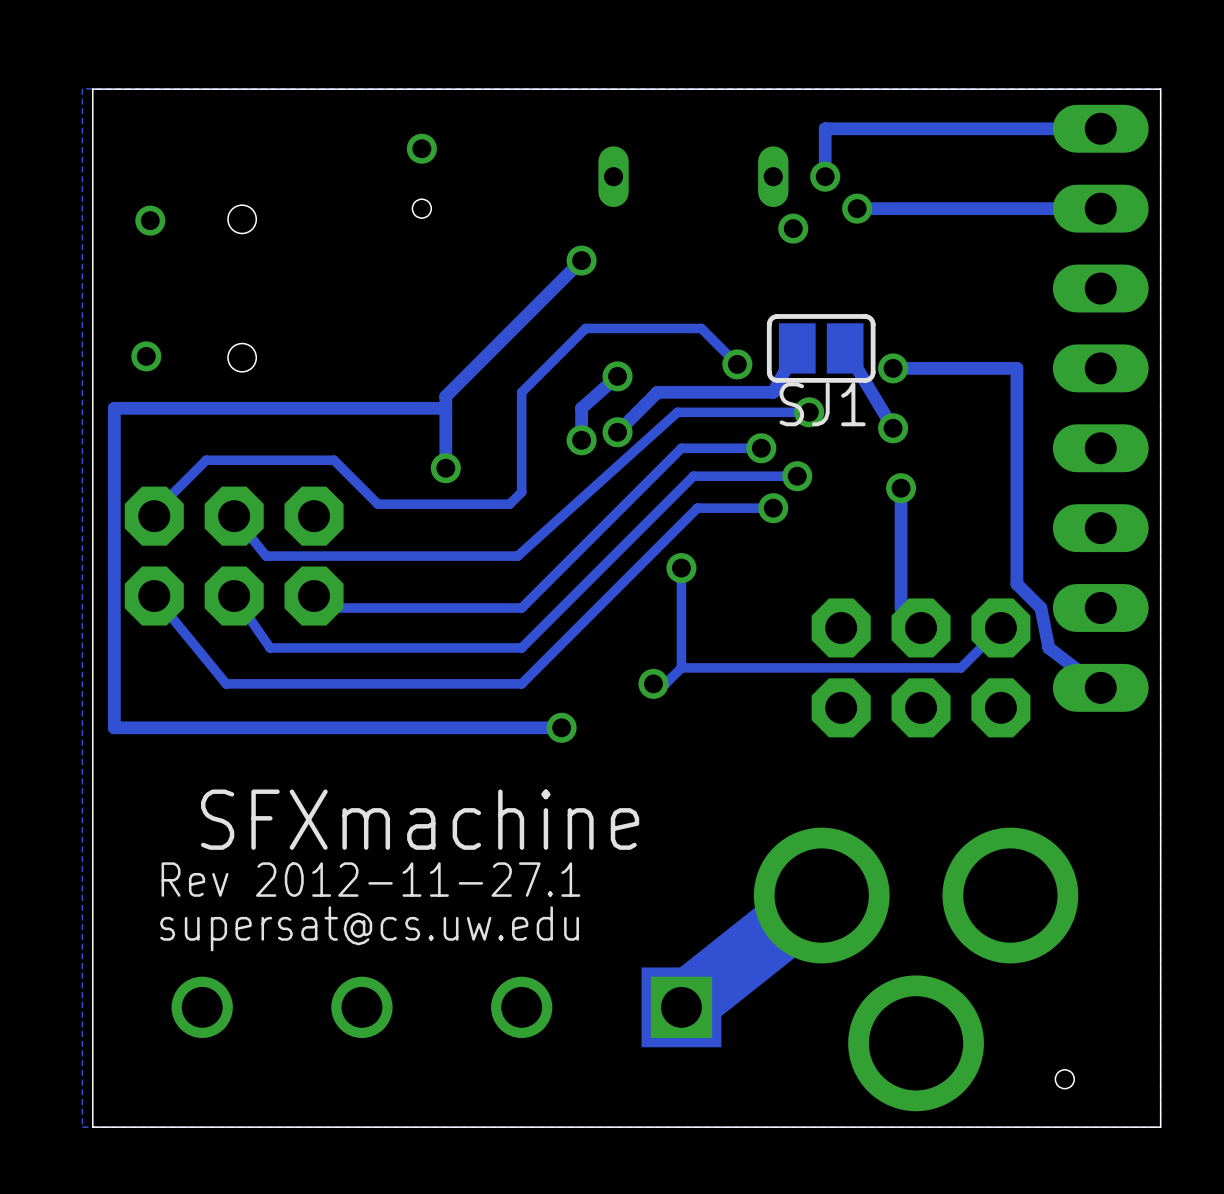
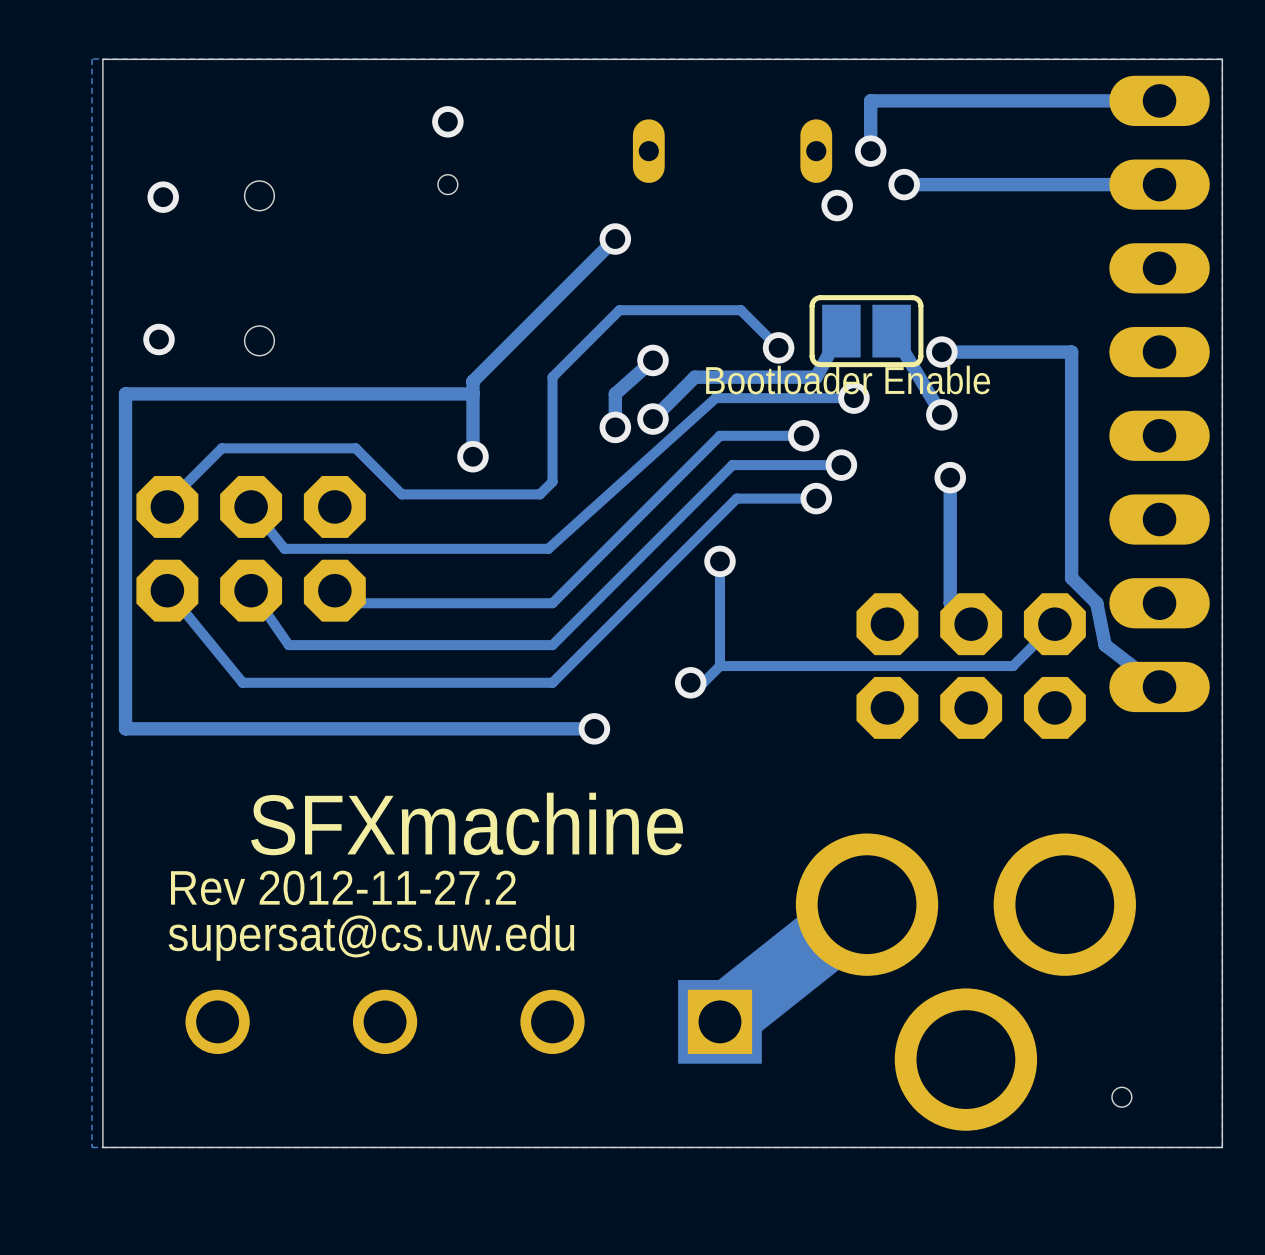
text: none -> Bootloader Enable (848, 380)
SJ1 name: SJ1 (822, 404) -> none
text: Rev 2012-11-27.1 (370, 879) -> Rev 2012-11-27.2 (343, 887)

